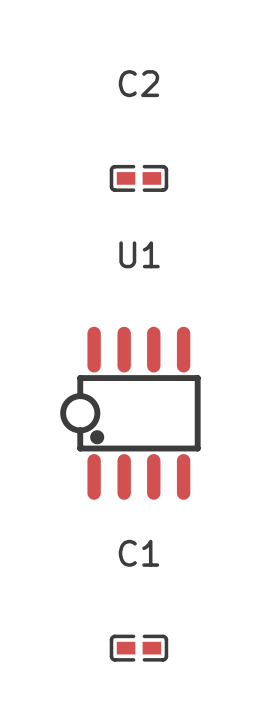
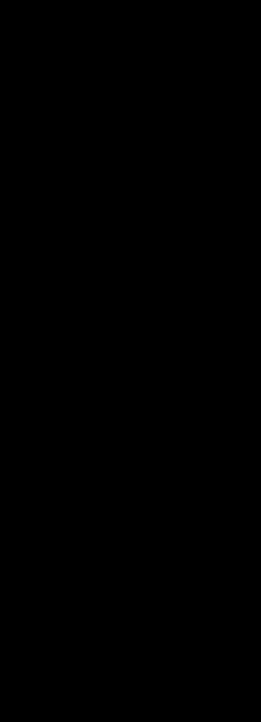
C2: (138, 178) -> none
U1: (130, 413) -> none
C1: (138, 648) -> none

